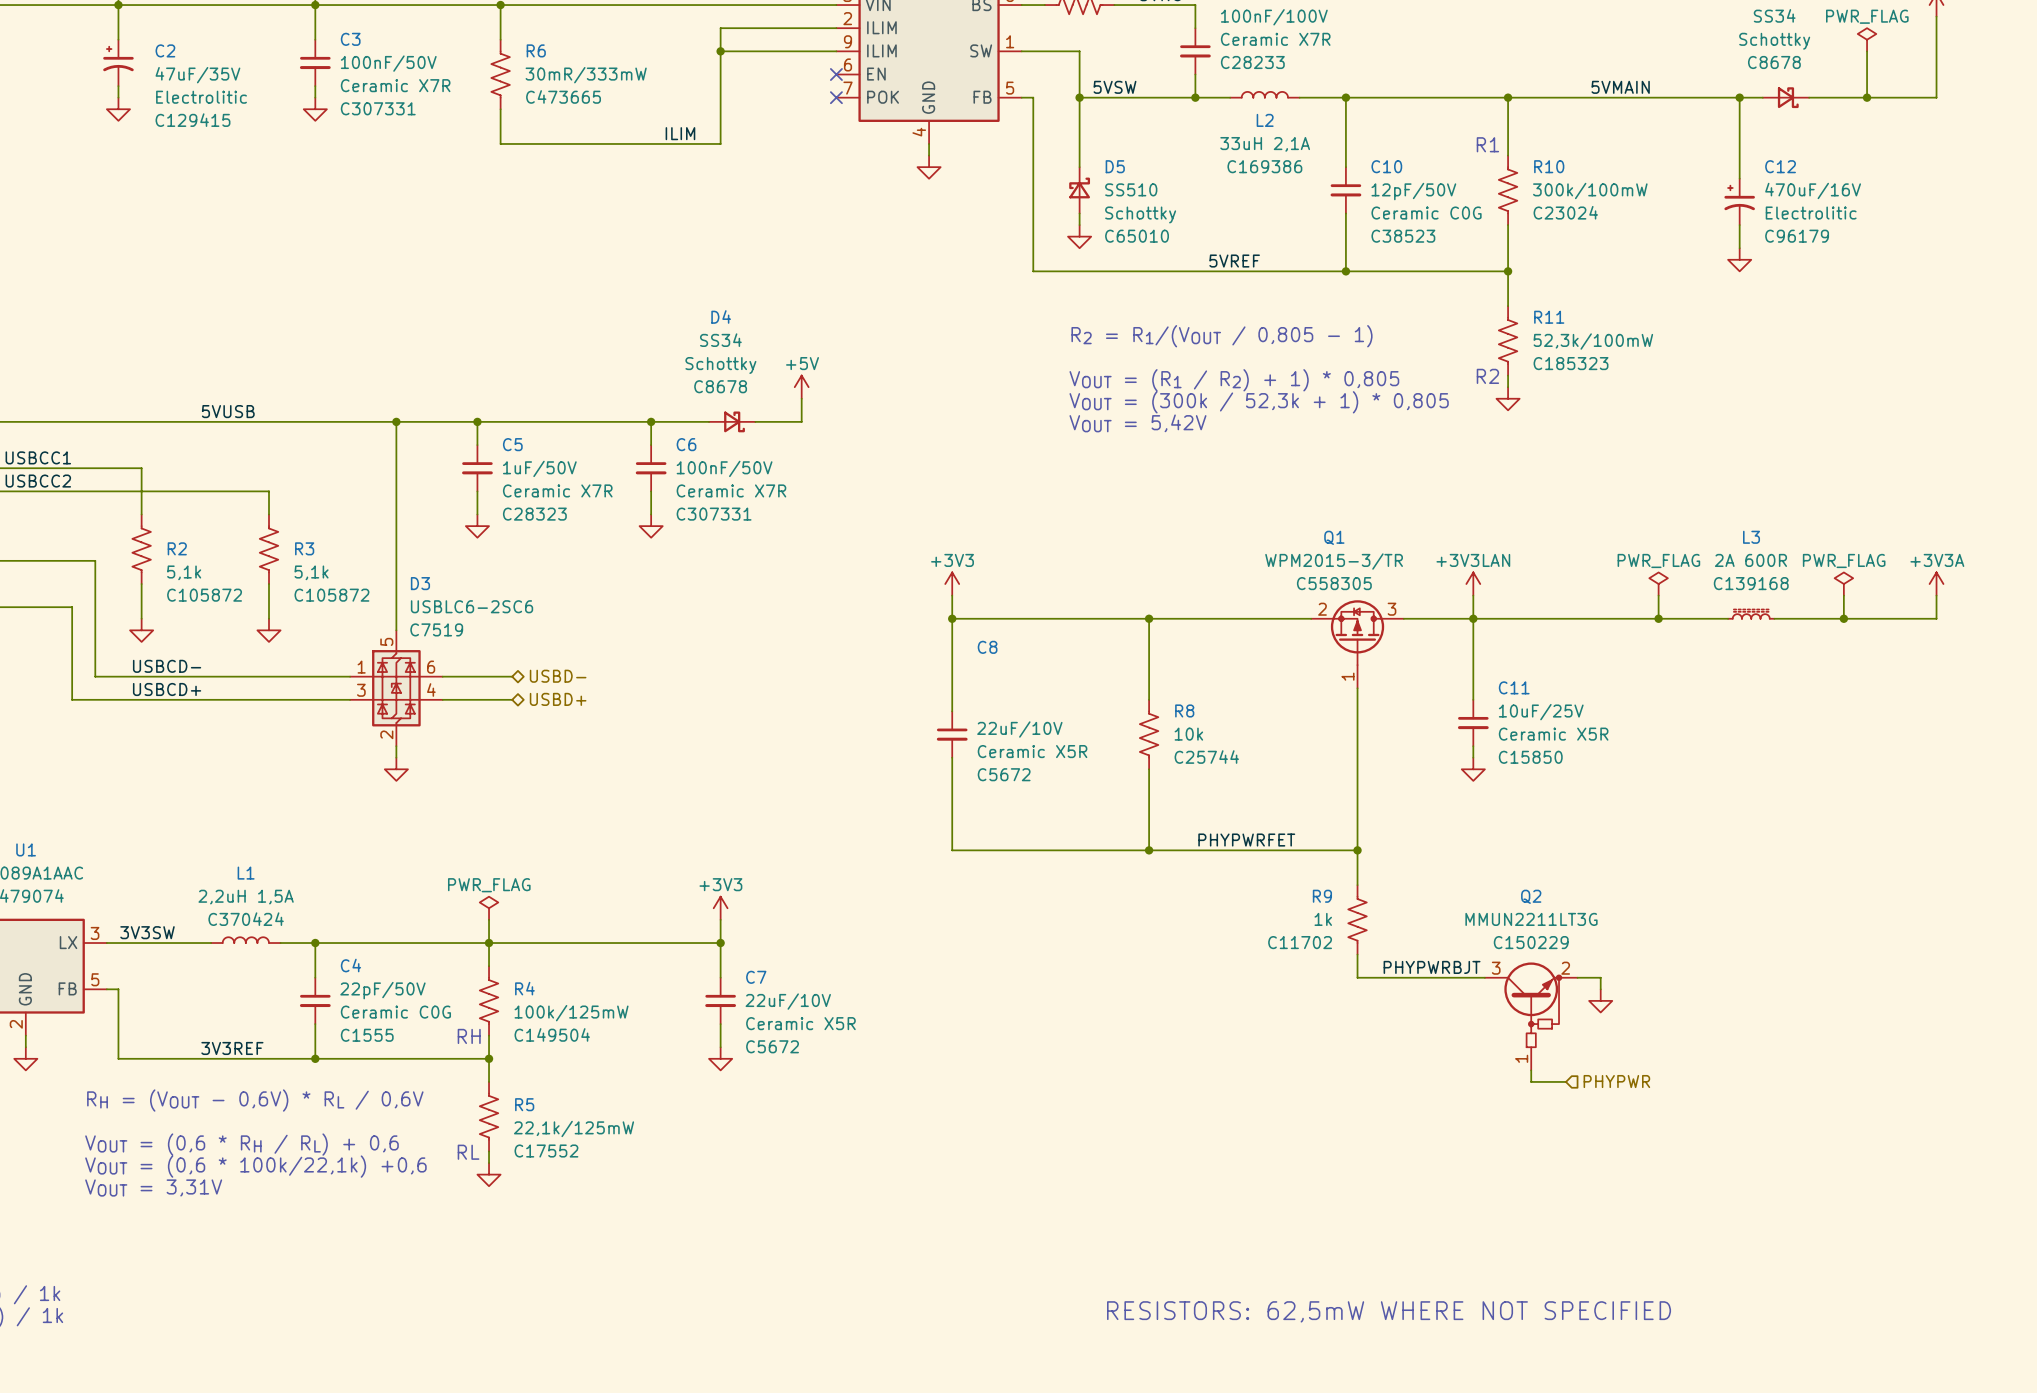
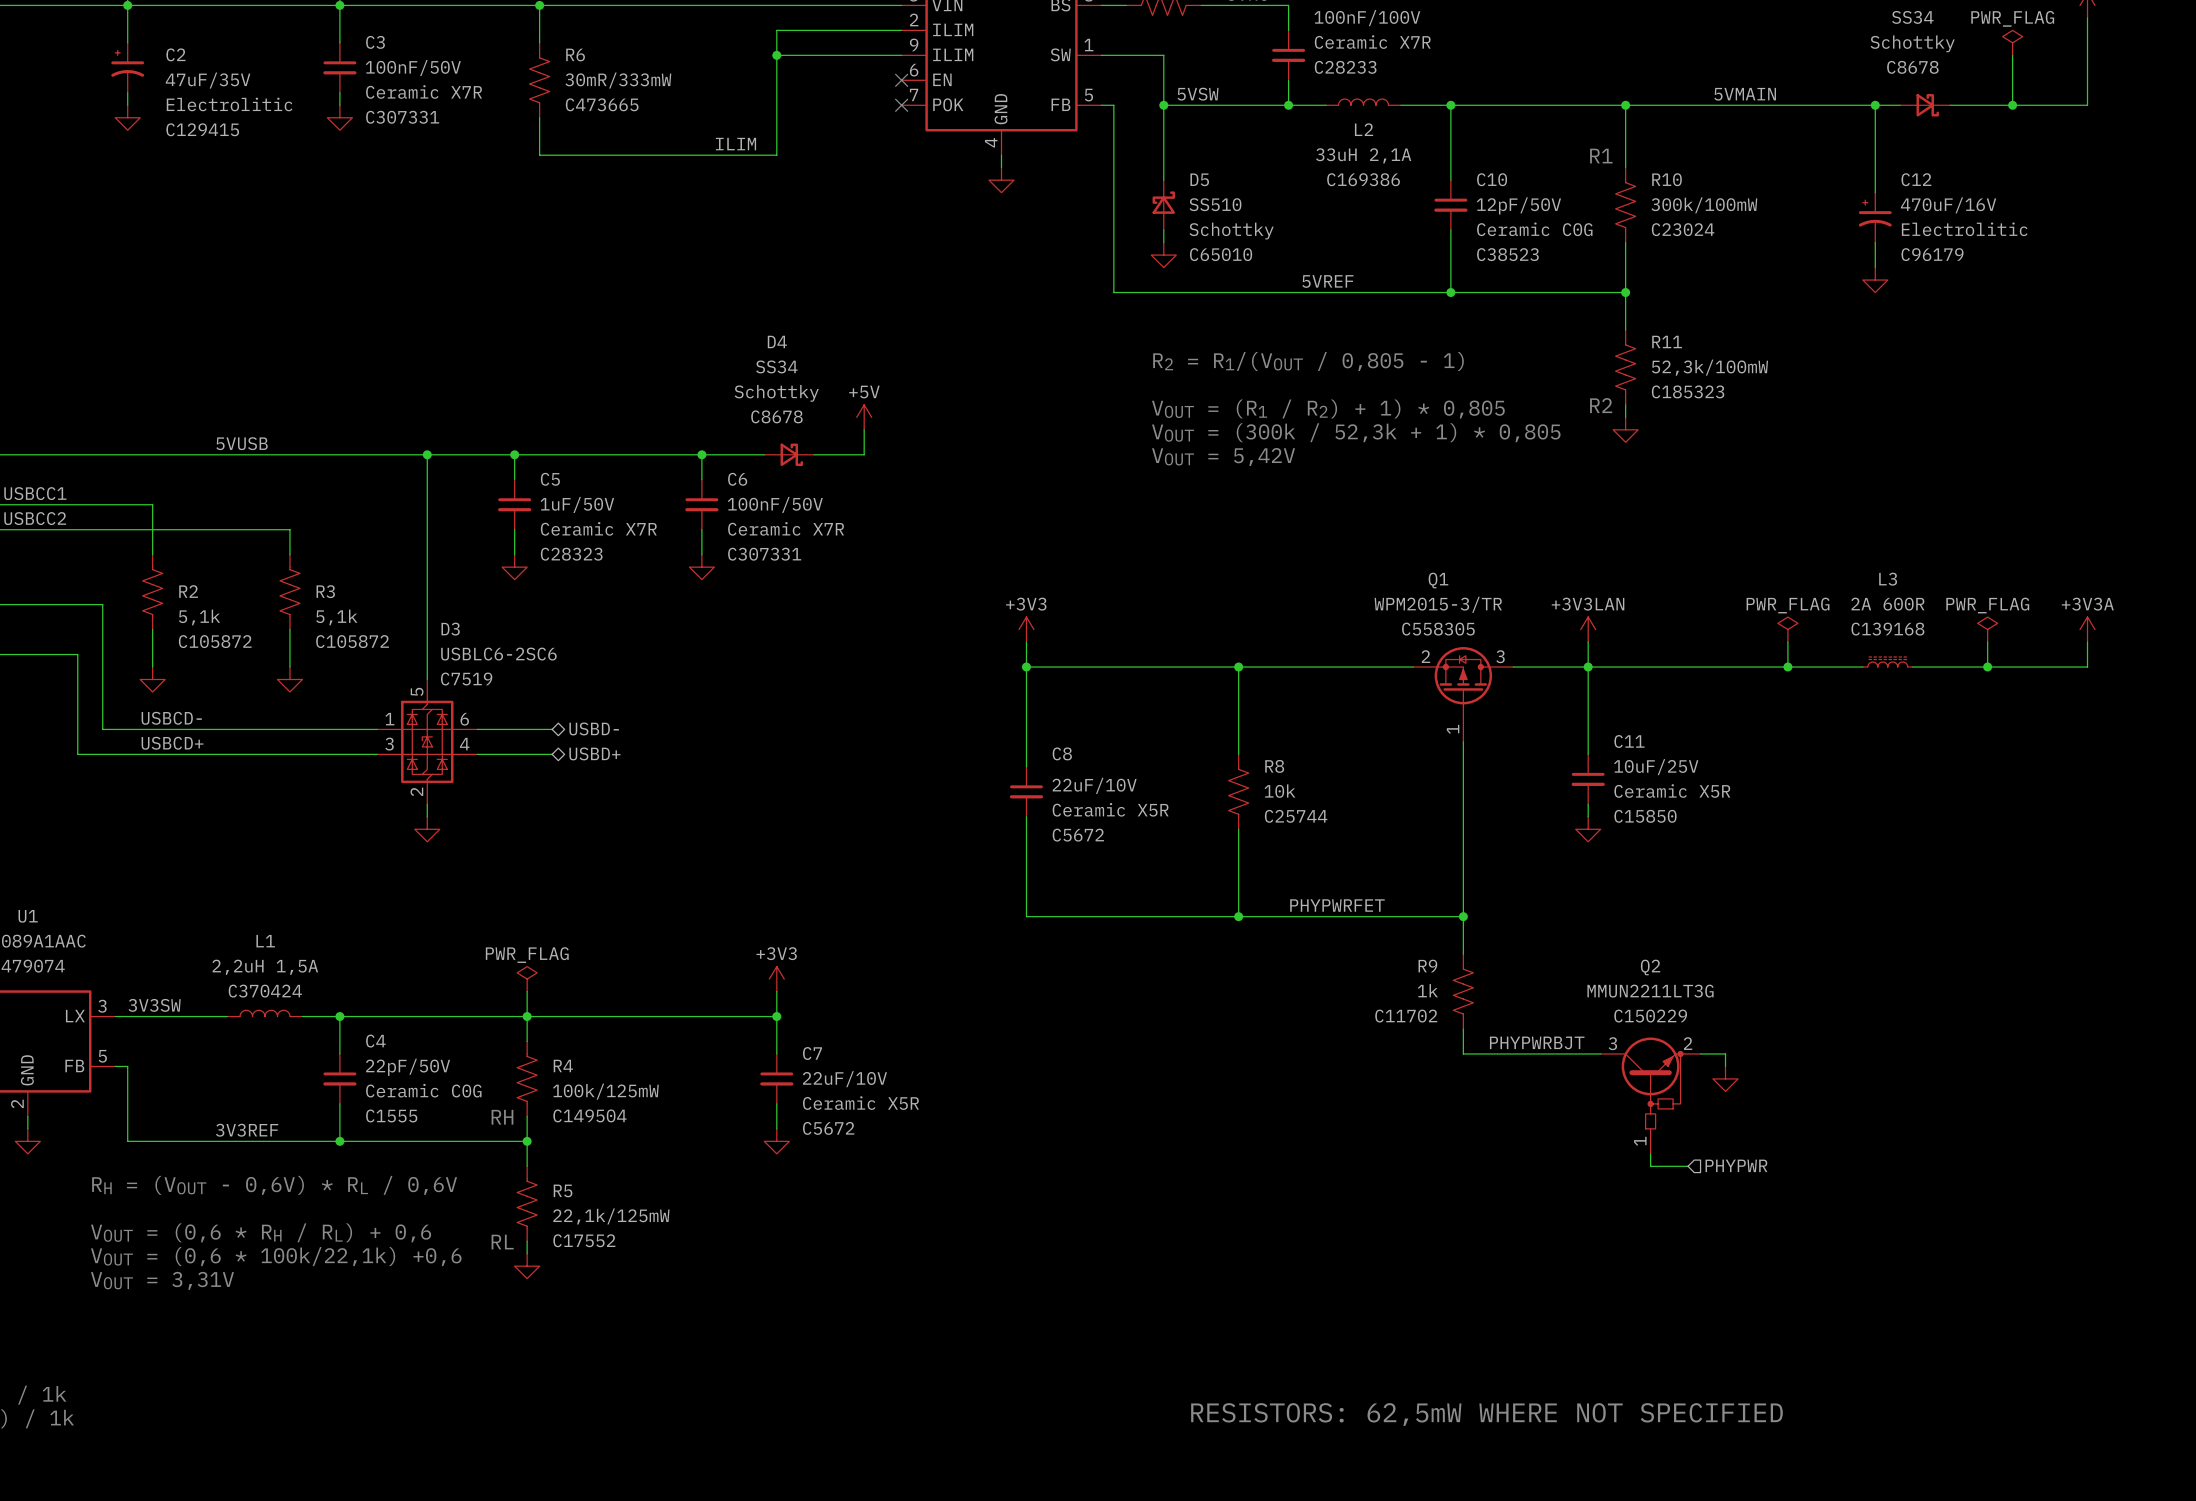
C8 name position: C8 (987, 647) -> C8 (1062, 753)

